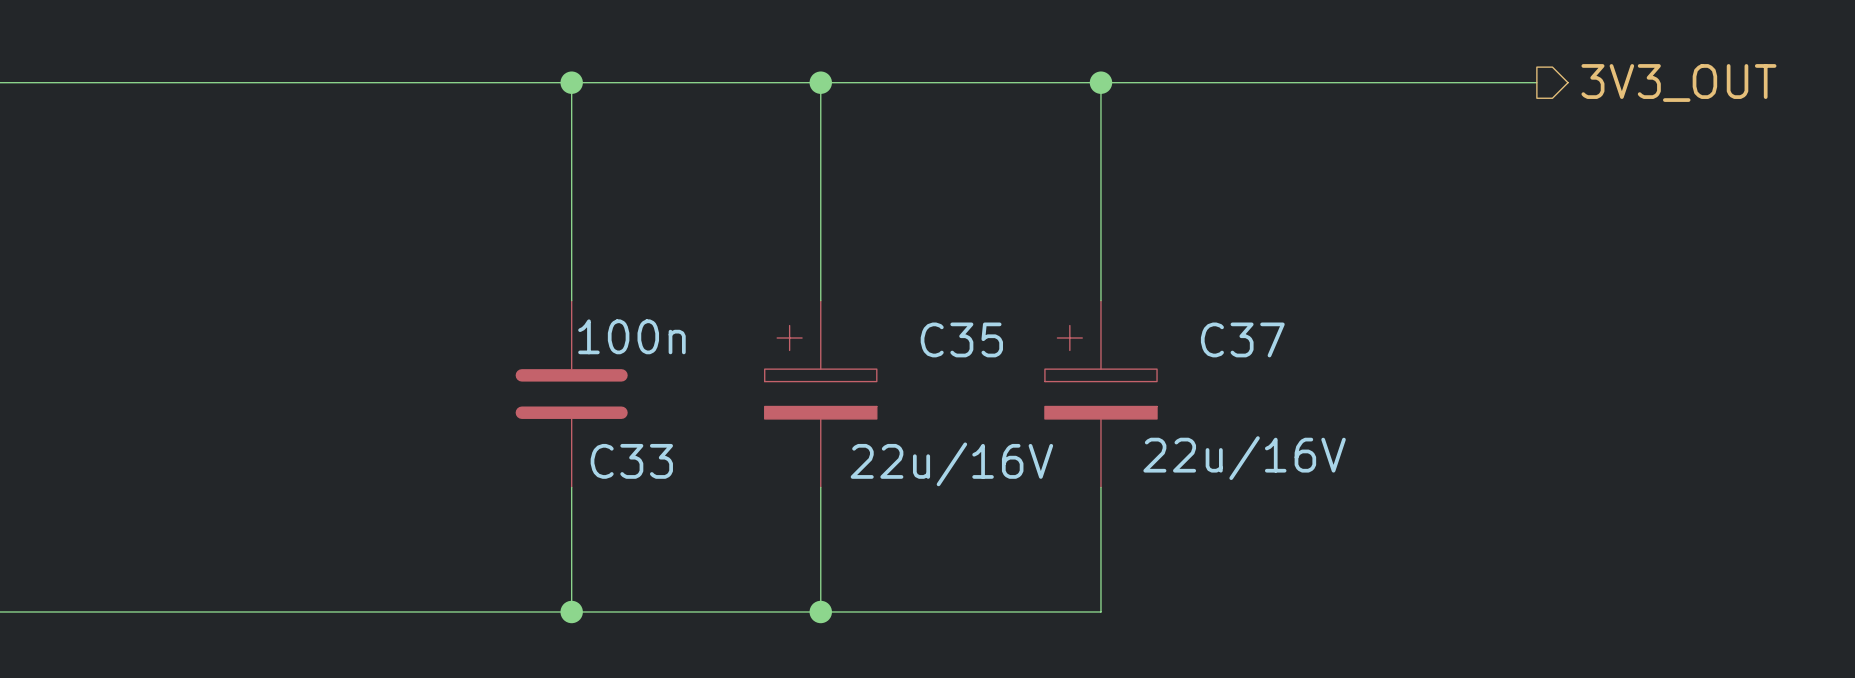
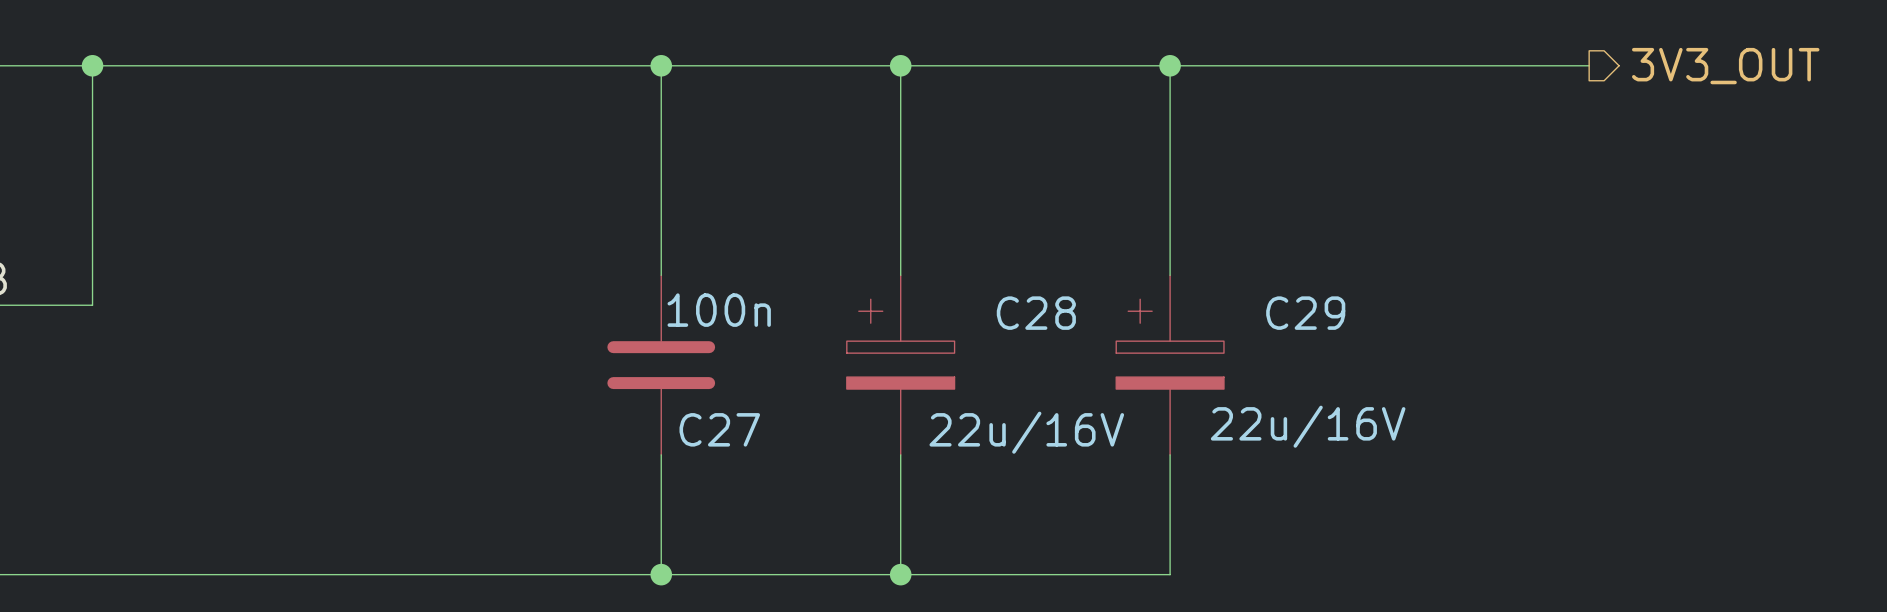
C35 name: C35 (961, 339) -> C28 (1036, 313)
C37 name: C37 (1242, 339) -> C29 (1305, 313)
C33 name: C33 (631, 461) -> C27 (719, 429)

